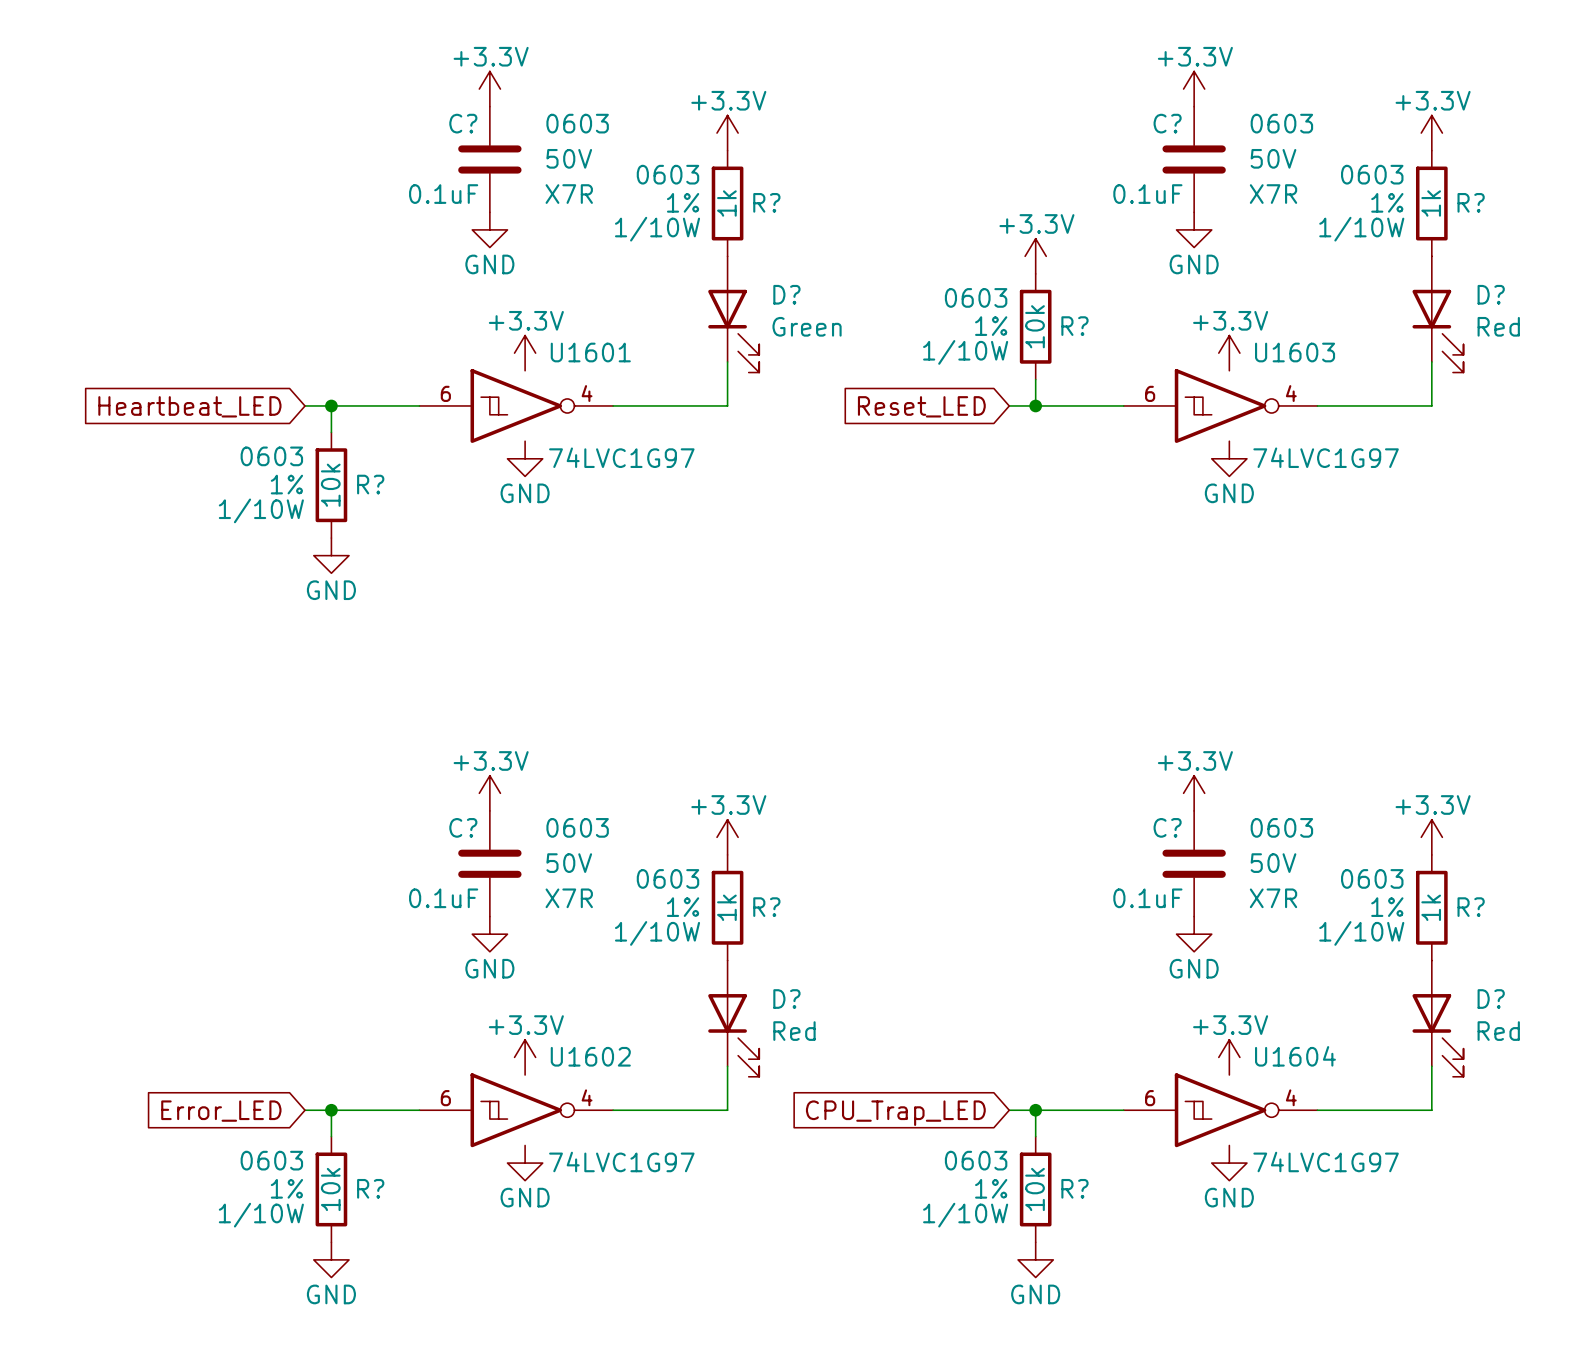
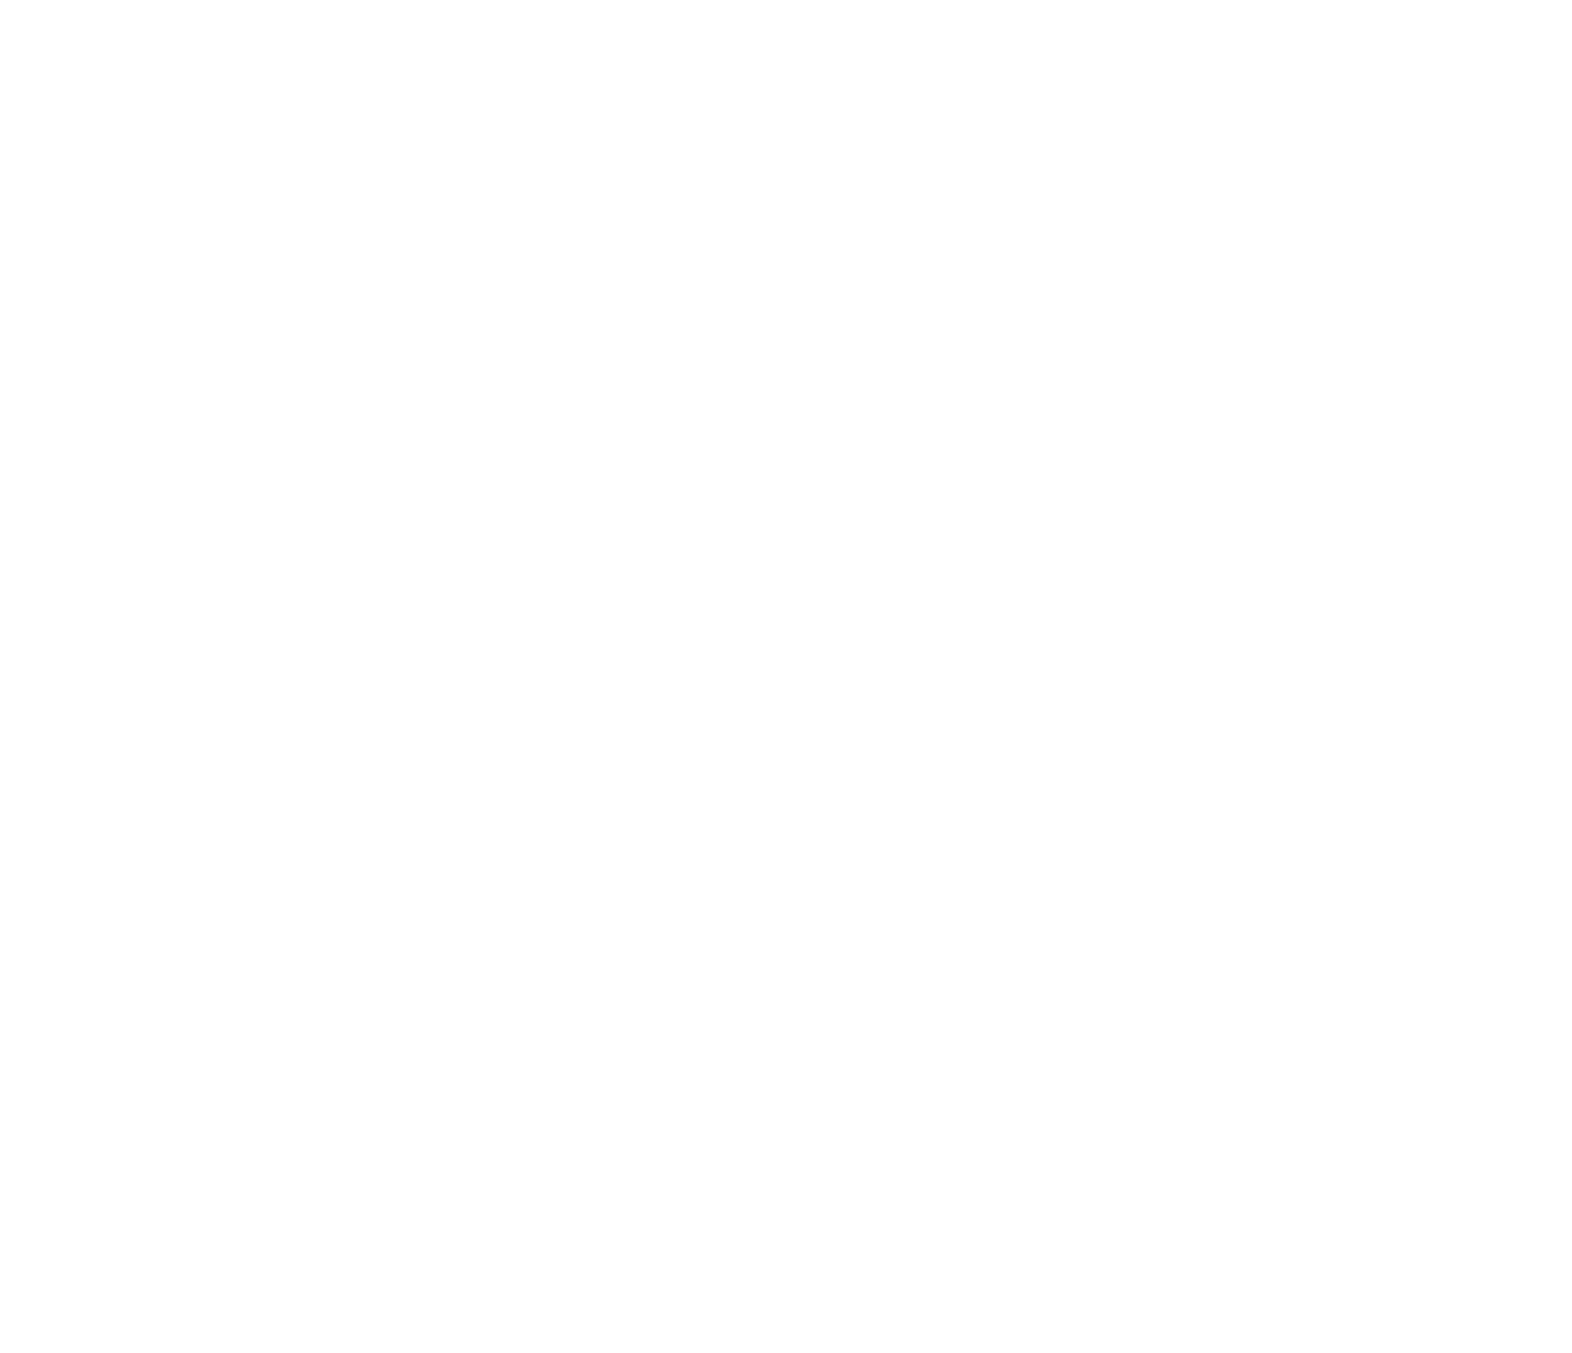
power symbol: +3.3V (489, 89) -> none
power symbol: +3.3V (1194, 89) -> none
power symbol: +3.3V (727, 133) -> none
power symbol: +3.3V (1431, 133) -> none
C?: 0.1uF (489, 159) -> none
C?: 0.1uF (1194, 159) -> none
R?: 1k (727, 203) -> none
R?: 1k (1431, 203) -> none
power symbol: GND (489, 229) -> none
power symbol: GND (1194, 229) -> none
power symbol: +3.3V (1035, 256) -> none
D?: Green (733, 314) -> none
D?: Red (1437, 314) -> none
R?: 10k (1035, 326) -> none
power symbol: +3.3V (525, 353) -> none
power symbol: +3.3V (1229, 353) -> none
wire: (727, 361) (727, 405) (613, 405) -> none
wire: (1431, 361) (1431, 405) (1317, 405) -> none
wire: (1035, 379) (1035, 405) -> none
wire: (305, 405) (419, 405) -> none
wire: (331, 405) (331, 432) -> none
junction: (331, 405) -> none
U1601: 74LVC1G97 (516, 405) -> none
wire: (1009, 405) (1123, 405) -> none
junction: (1035, 405) -> none
U1603: 74LVC1G97 (1220, 405) -> none
global label: Heartbeat_LED (189, 406) -> none
global label: Reset_LED (921, 406) -> none
power symbol: GND (525, 458) -> none
power symbol: GND (1229, 458) -> none
R?: 10k (331, 485) -> none
power symbol: GND (331, 555) -> none
power symbol: +3.3V (489, 793) -> none
power symbol: +3.3V (1194, 793) -> none
power symbol: +3.3V (727, 837) -> none
power symbol: +3.3V (1431, 837) -> none
C?: 0.1uF (489, 863) -> none
C?: 0.1uF (1194, 863) -> none
R?: 1k (727, 907) -> none
R?: 1k (1431, 907) -> none
power symbol: GND (489, 934) -> none
power symbol: GND (1194, 934) -> none
D?: Red (733, 1018) -> none
D?: Red (1437, 1018) -> none
power symbol: +3.3V (525, 1057) -> none
power symbol: +3.3V (1229, 1057) -> none
wire: (727, 1066) (727, 1110) (613, 1110) -> none
wire: (1431, 1066) (1431, 1110) (1317, 1110) -> none
wire: (305, 1110) (419, 1110) -> none
wire: (331, 1110) (331, 1136) -> none
junction: (331, 1110) -> none
U1602: 74LVC1G97 (516, 1110) -> none
wire: (1009, 1110) (1123, 1110) -> none
wire: (1035, 1110) (1035, 1136) -> none
junction: (1035, 1110) -> none
U1604: 74LVC1G97 (1220, 1110) -> none
global label: Error_LED (221, 1111) -> none
global label: CPU_Trap_LED (895, 1113) -> none
power symbol: GND (525, 1163) -> none
power symbol: GND (1229, 1163) -> none
R?: 10k (331, 1189) -> none
R?: 10k (1035, 1189) -> none
power symbol: GND (331, 1259) -> none
power symbol: GND (1035, 1259) -> none

